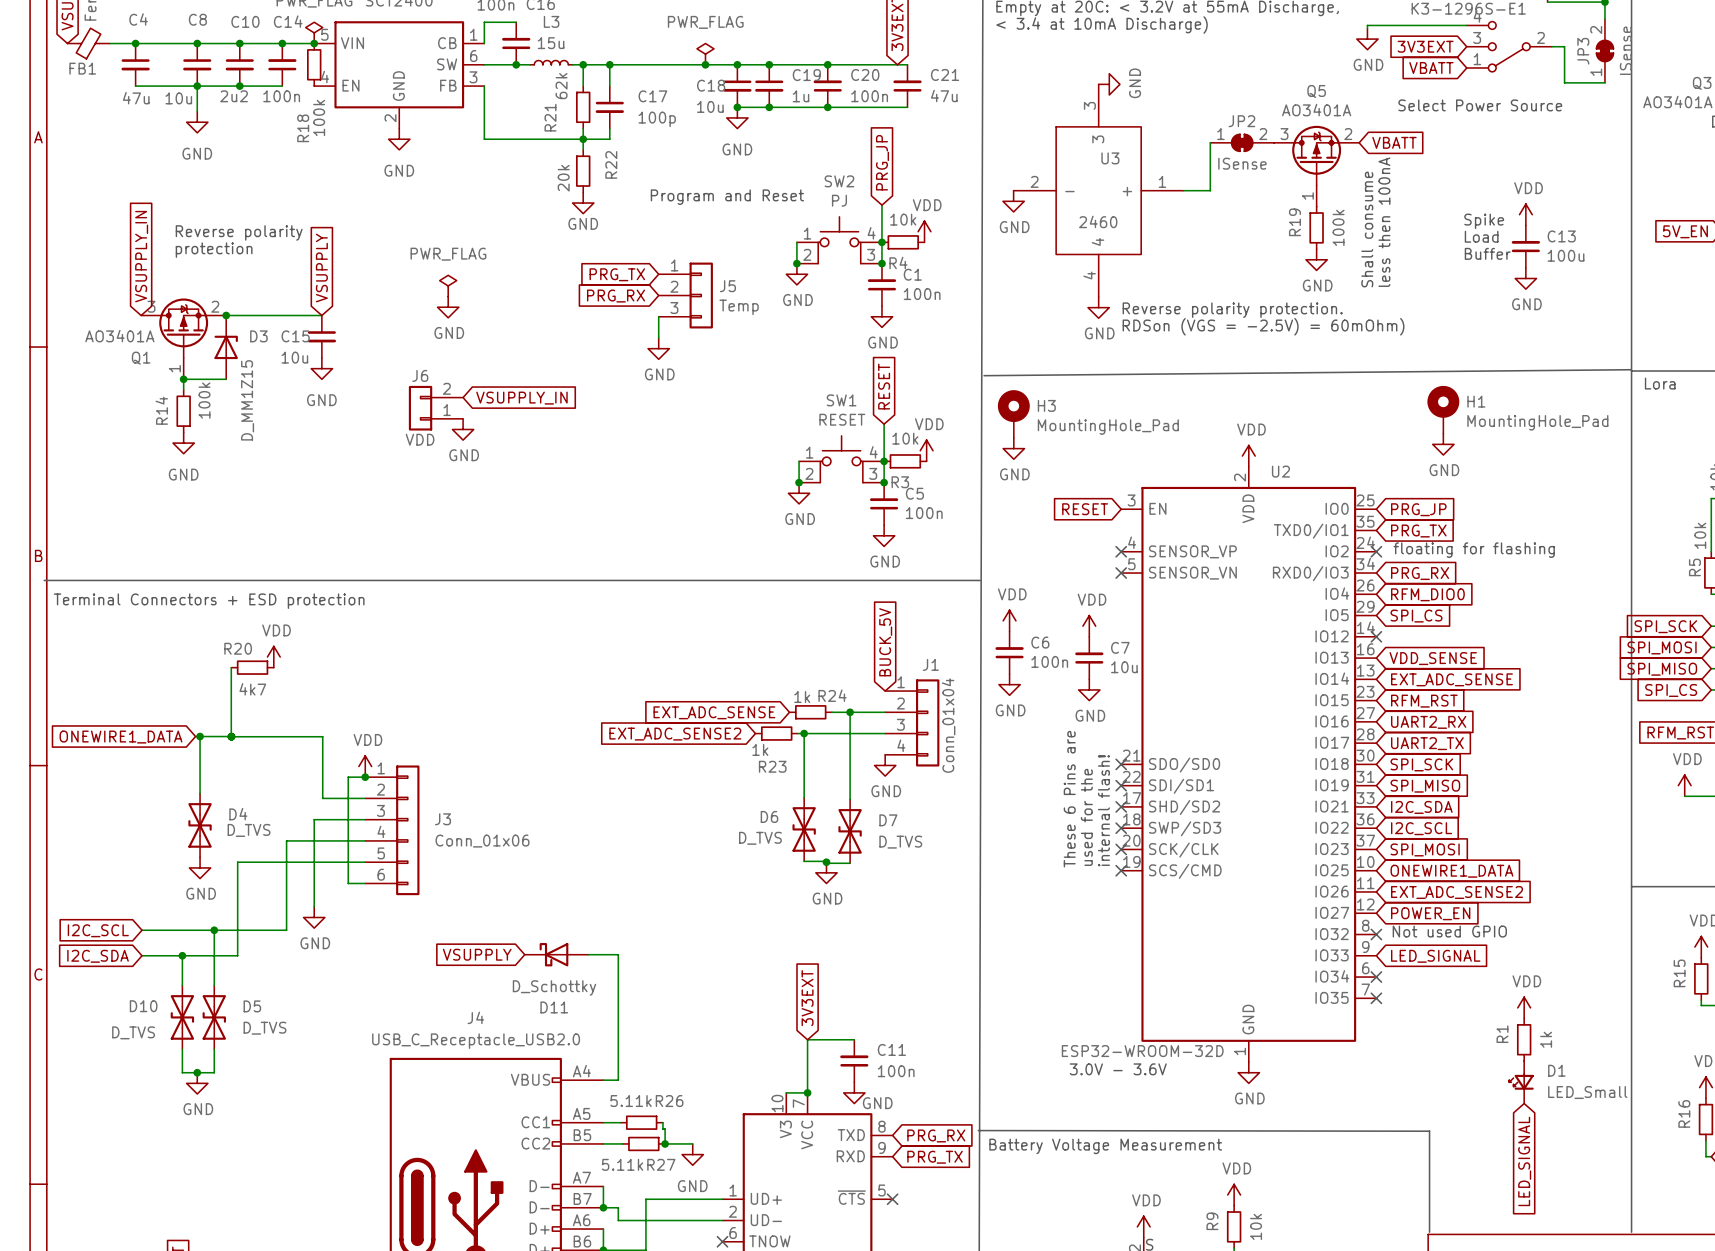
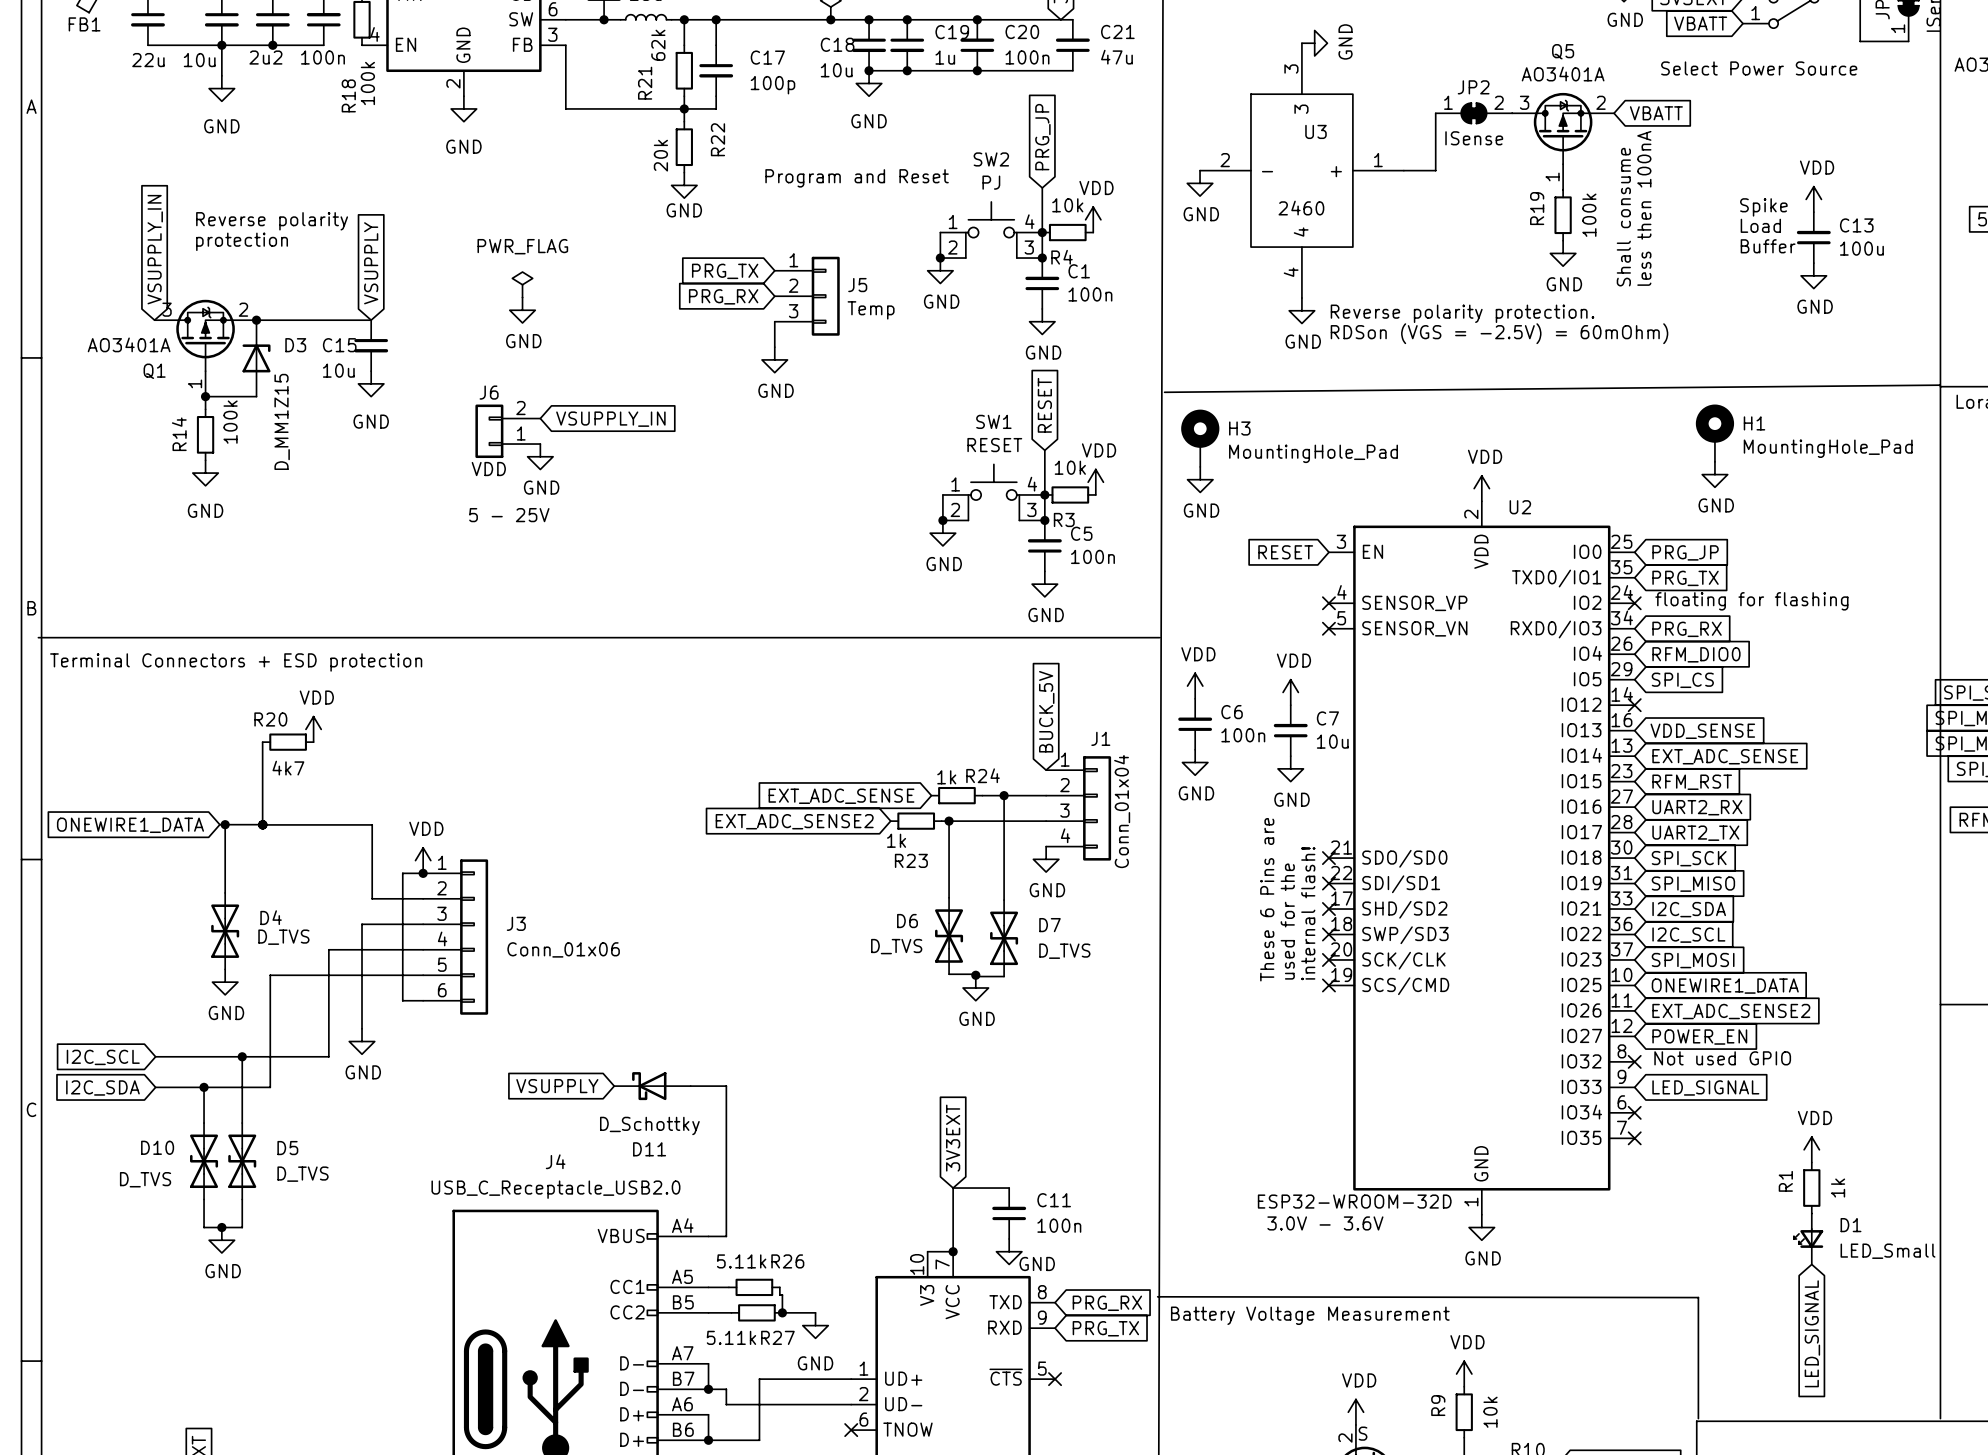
C4 value: 47u (136, 98) -> 22u (148, 60)
text: none -> 5 - 25V (509, 515)

